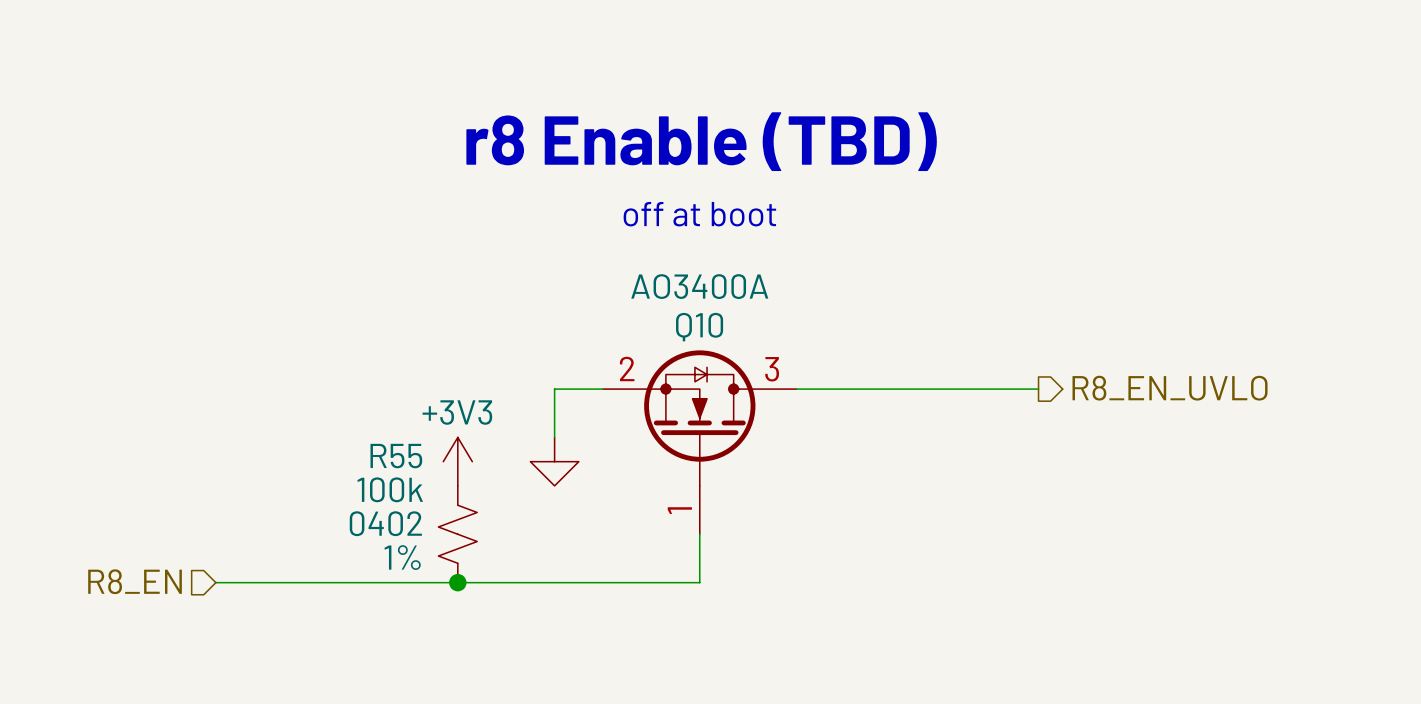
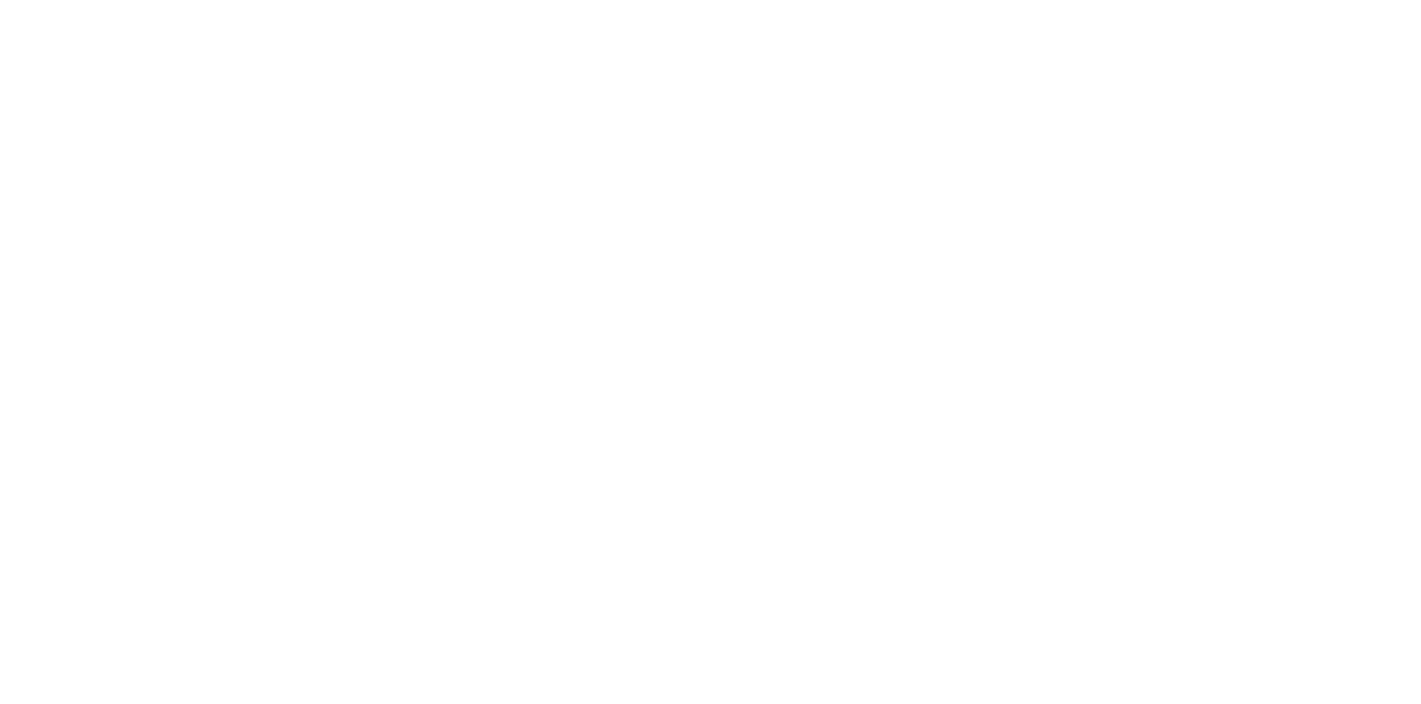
text: r8 Enable (TBD) (701, 141) -> none
text: off at boot (699, 214) -> none
hierarchical label: R8_EN_UVLO (1170, 388) -> none
wire: (602, 389) (554, 389) (554, 437) -> none
wire: (796, 389) (1038, 389) -> none
Q10: AO3400A (699, 442) -> none
power symbol: +3V3 (457, 461) -> none
power symbol: (554, 461) -> none
R55: 100k (457, 534) -> none
wire: (699, 534) (699, 582) (215, 582) -> none
hierarchical label: R8_EN (135, 581) -> none
junction: (457, 582) -> none

